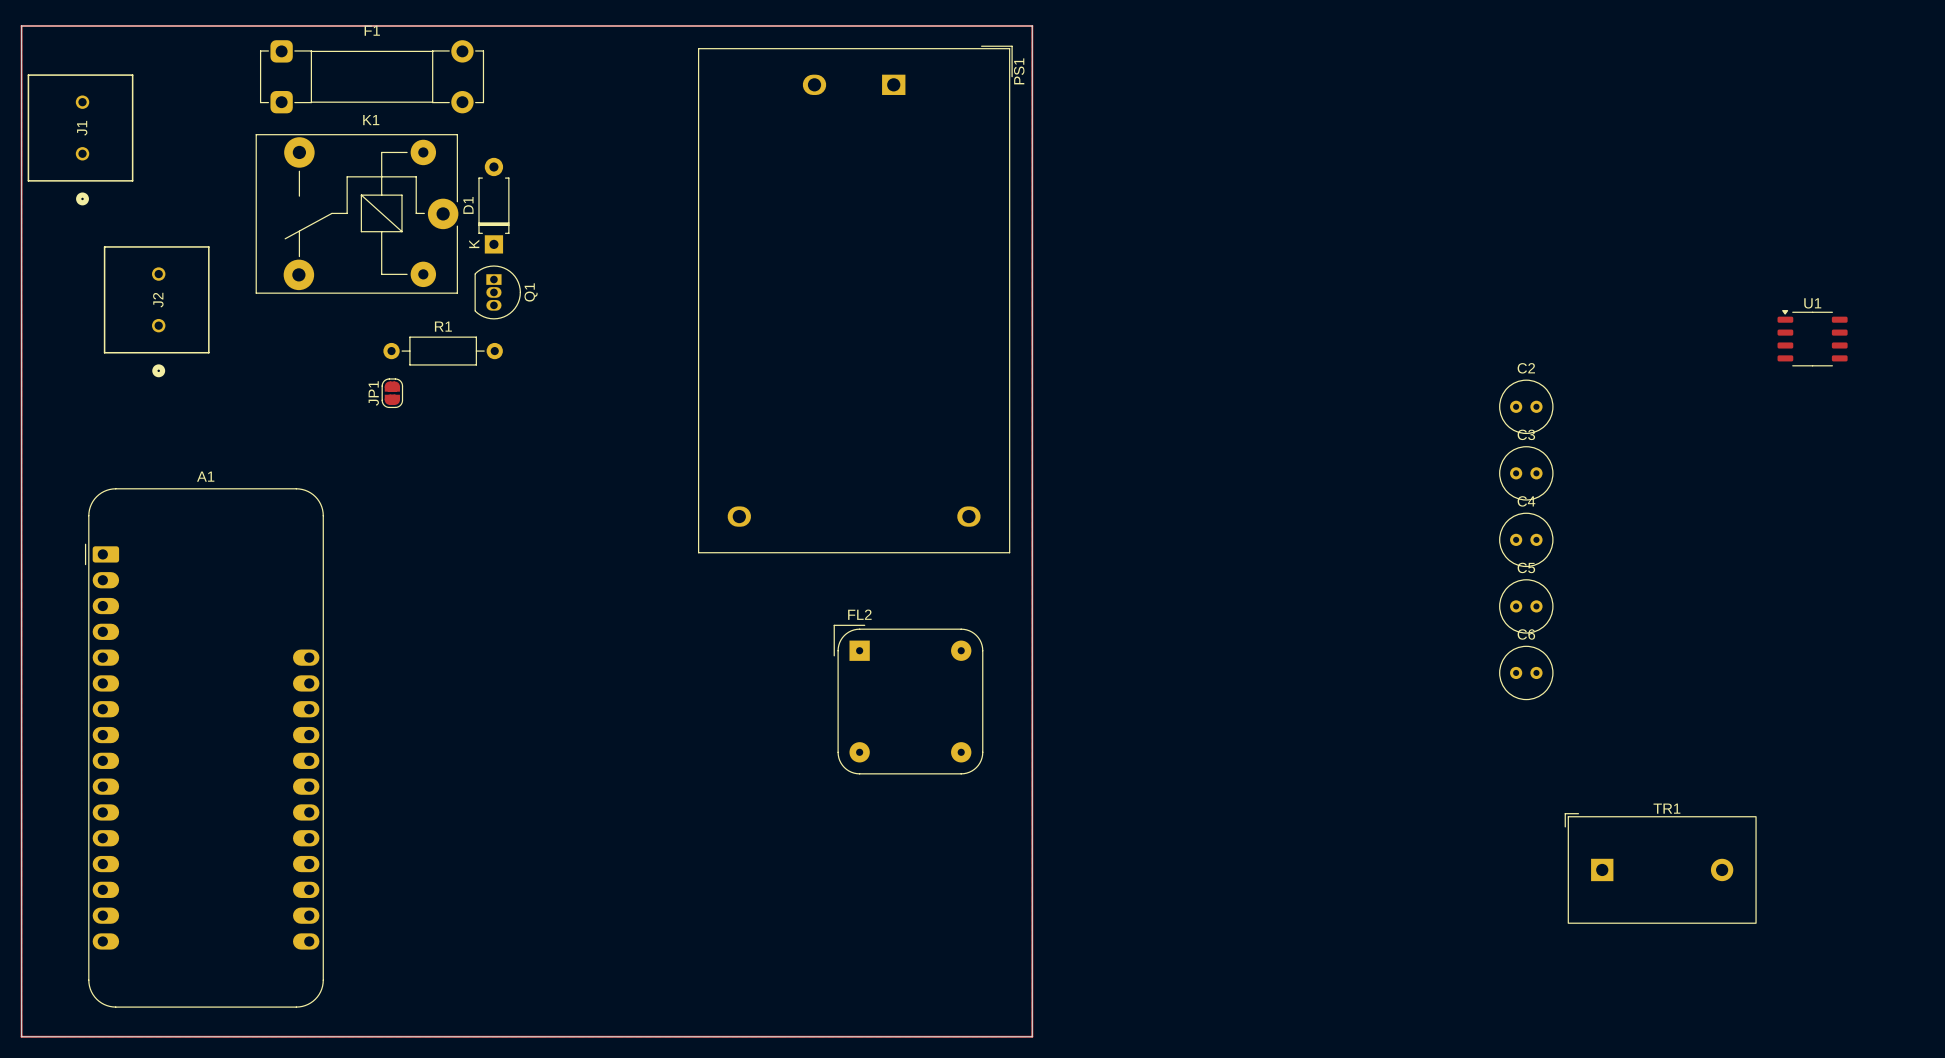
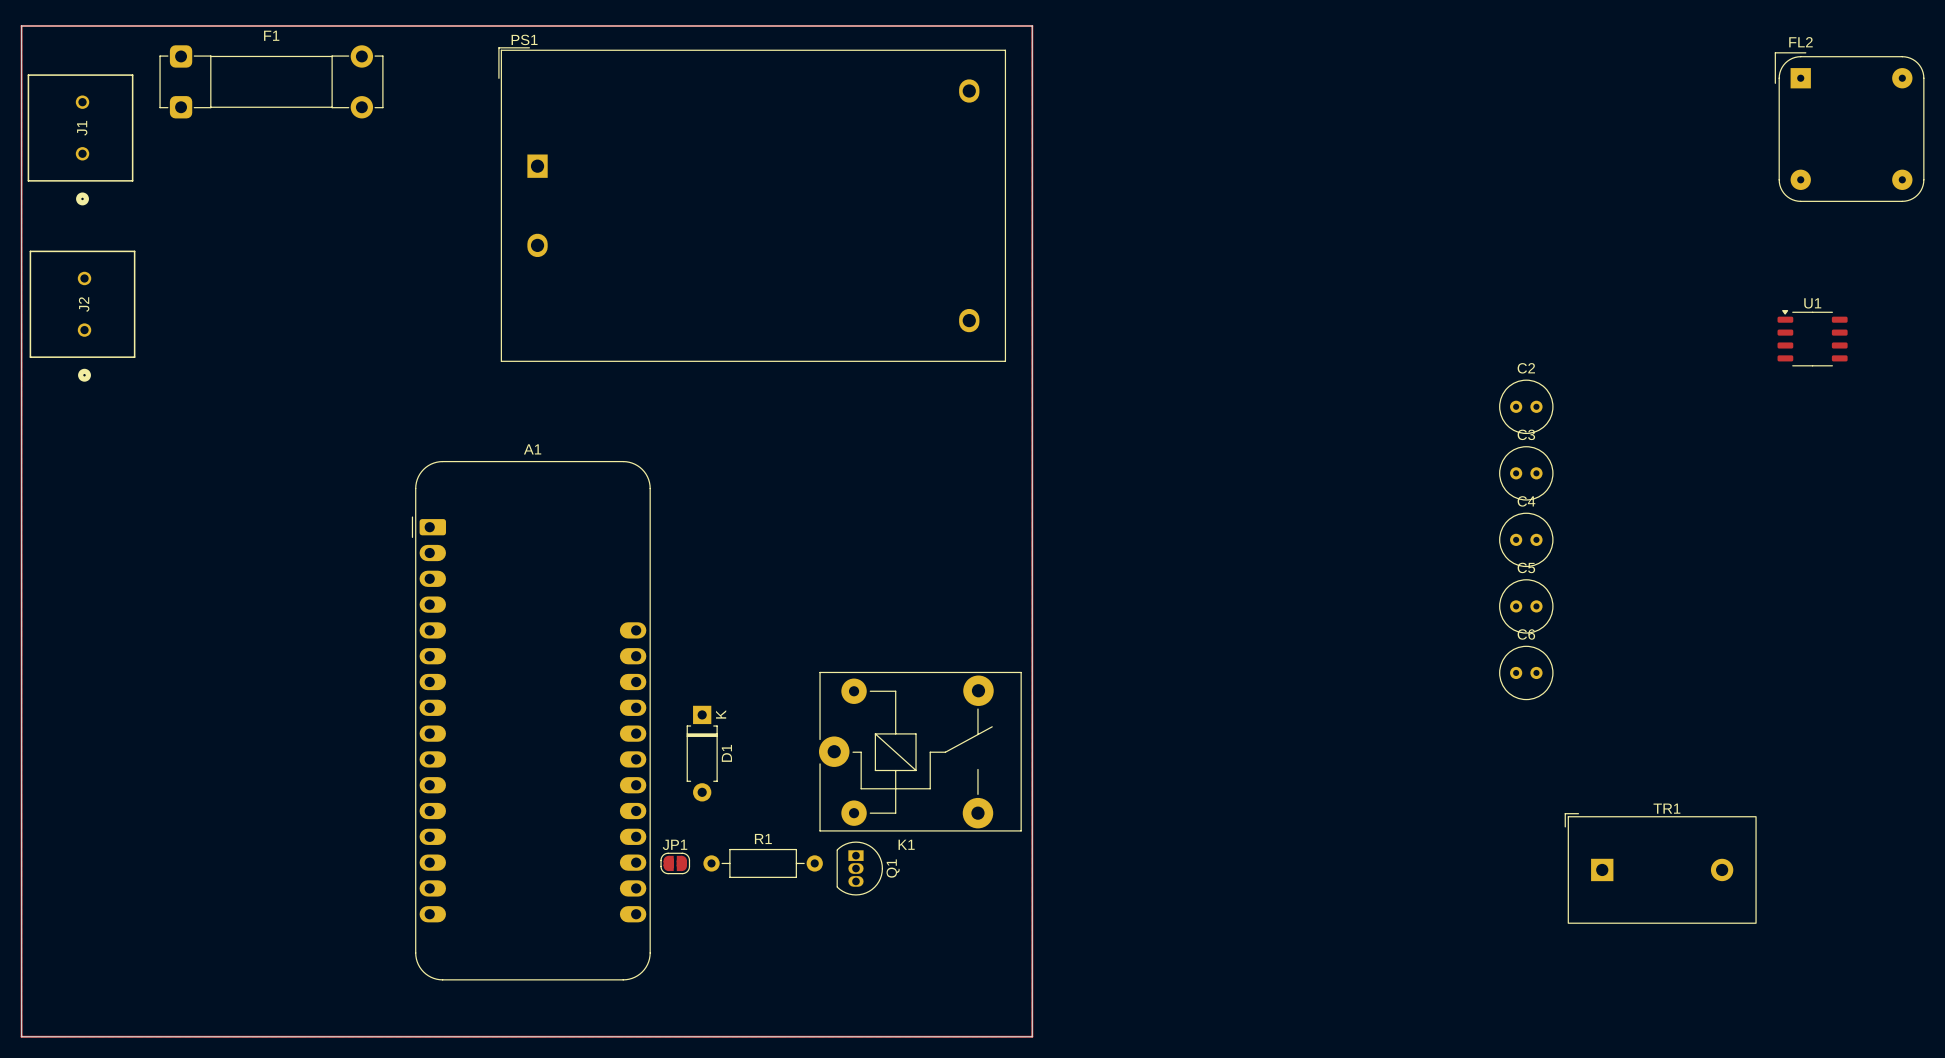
F1 position: (372, 76) -> (271, 81)
D1 rotation: 0° (493, 205) -> 180° (702, 753)
D1 position: (493, 205) -> (702, 753)
K1 rotation: 0° (357, 213) -> 180° (920, 751)
K1 position: (357, 213) -> (920, 751)
Q1 position: (497, 292) -> (859, 868)
PS1 rotation: 0° (855, 299) -> 90° counterclockwise (752, 204)
J2 position: (156, 311) -> (82, 316)
R1 position: (443, 351) -> (763, 863)
JP1 rotation: 0° (392, 393) -> 90° clockwise (675, 863)
JP1 position: (392, 393) -> (675, 863)
FL2 position: (908, 699) -> (1849, 127)
A1 position: (204, 747) -> (531, 720)

